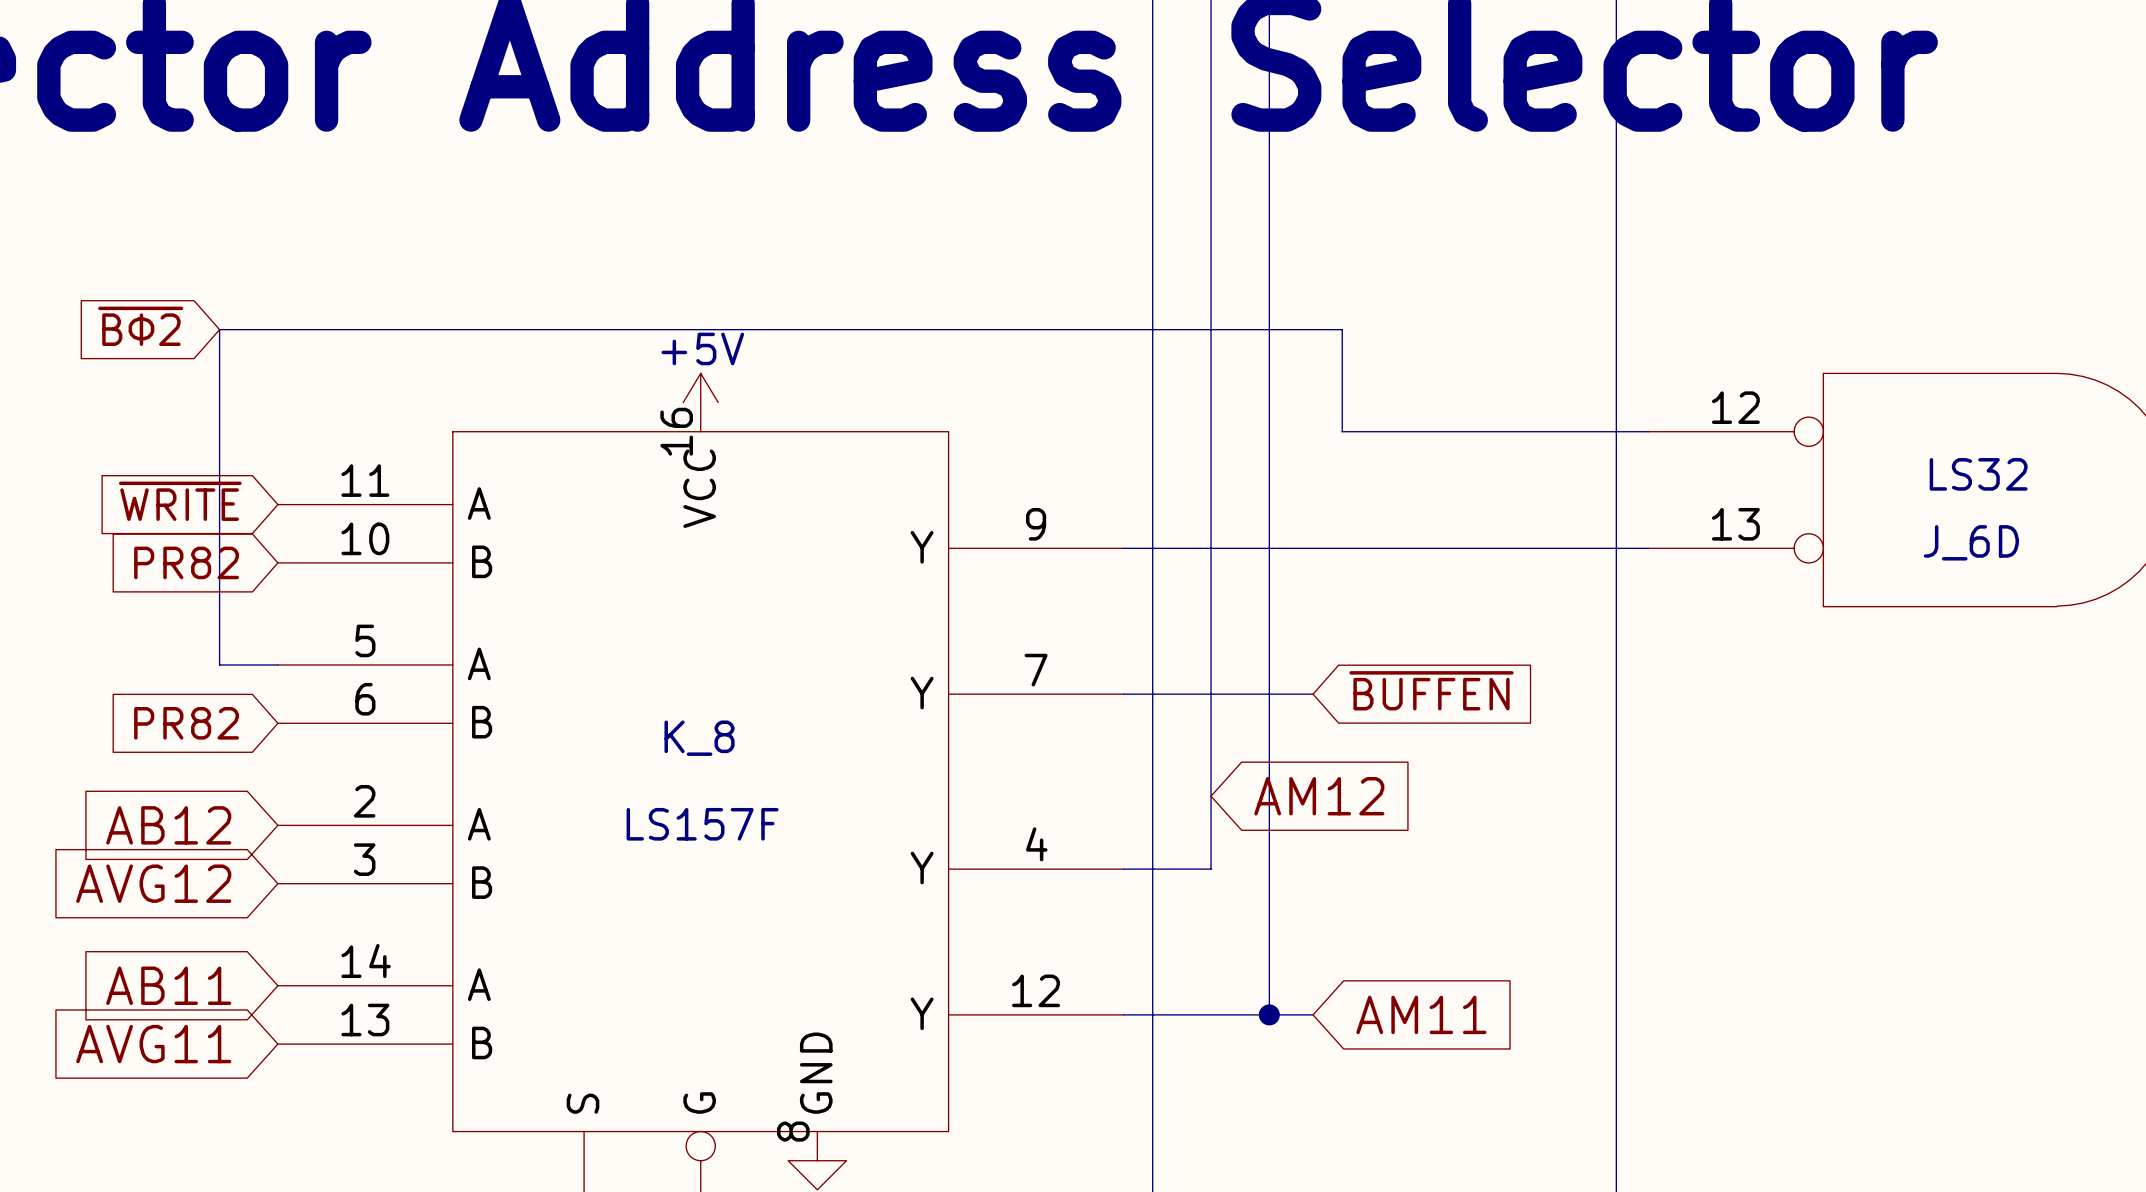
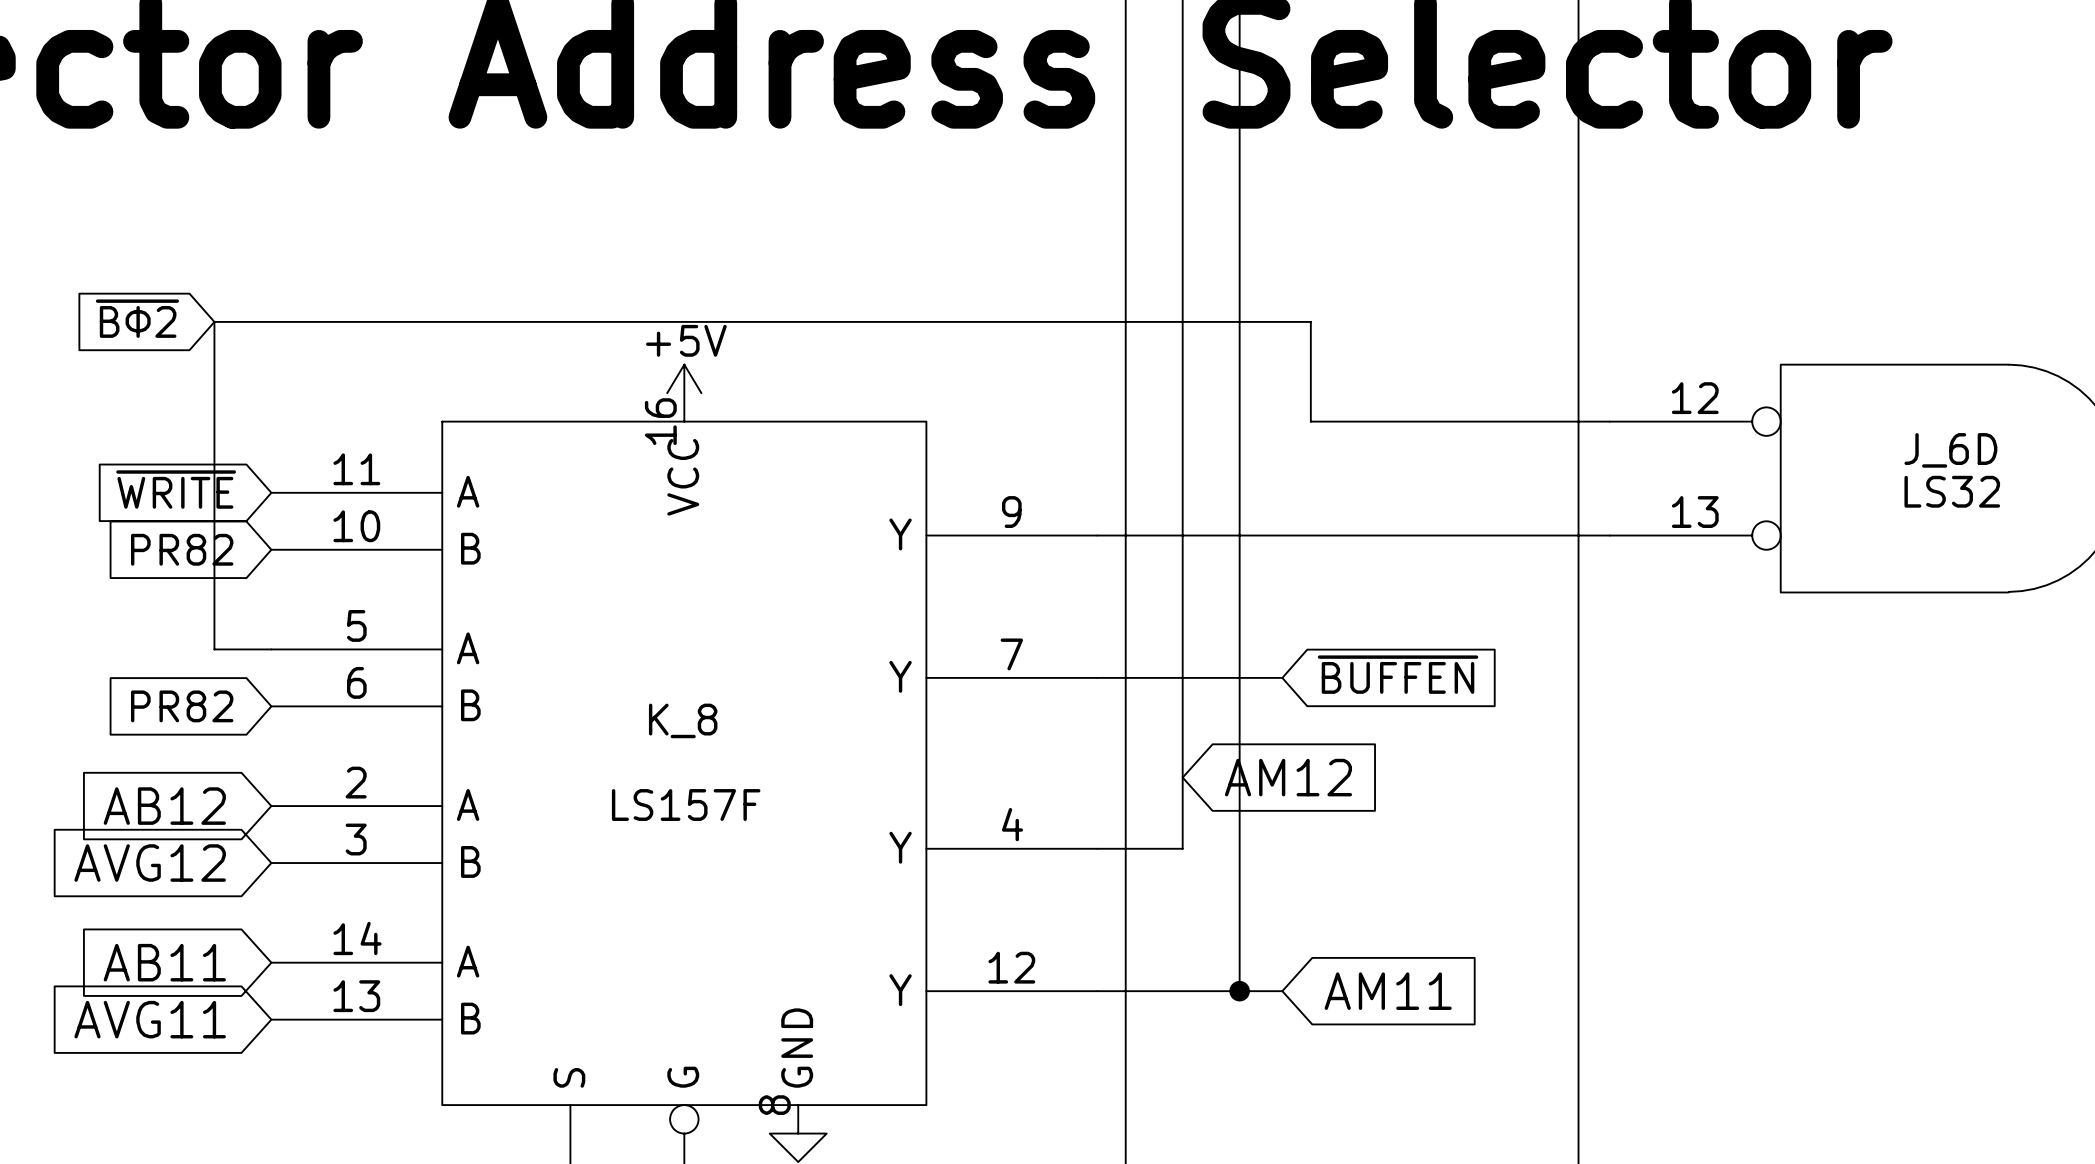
J_6D value position: LS32 (1978, 474) -> LS32 (1952, 491)
J_6D name position: J_6D (1971, 542) -> J_6D (1950, 450)

